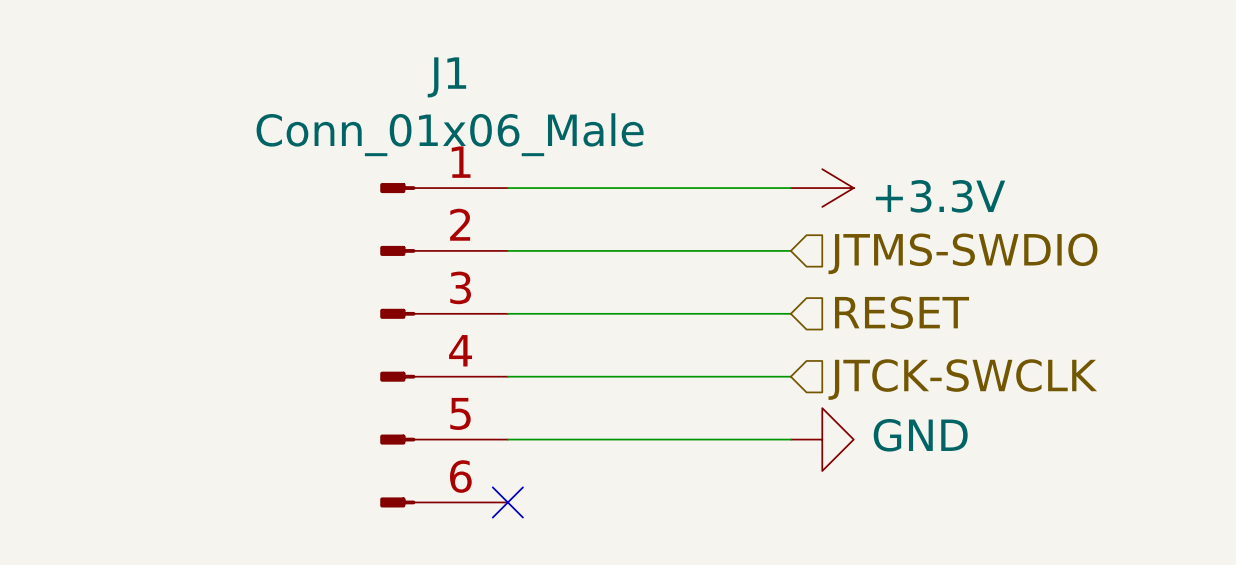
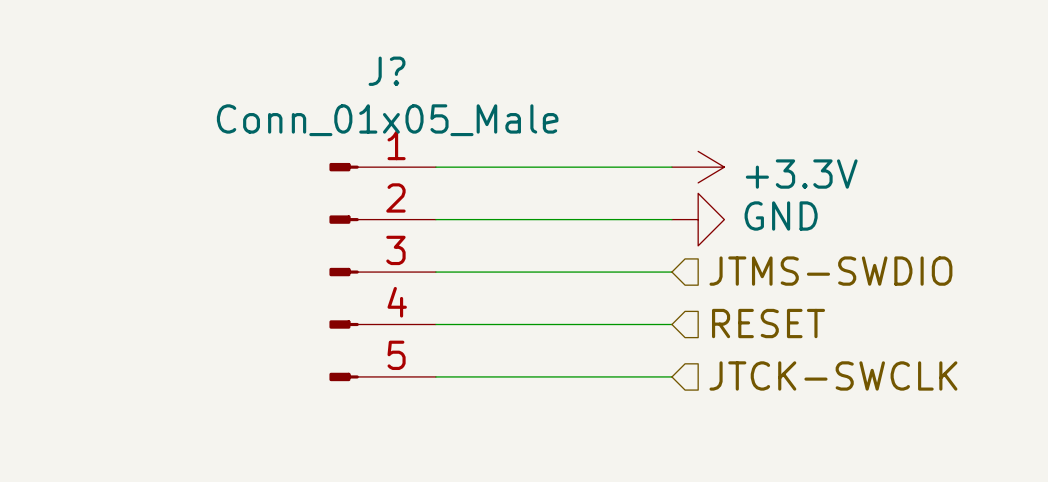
hierarchical label: JTMS-SWDIO (962, 253) -> none
hierarchical label: RESET (902, 312) -> JTMS-SWDIO (830, 271)
J?: none -> Conn_01x05_Male (382, 272)
J1: Conn_01x06_Male (444, 345) -> none
hierarchical label: JTCK-SWCLK (962, 379) -> RESET (768, 323)
power symbol position: GND (822, 439) -> GND (698, 219)
hierarchical label: none -> JTCK-SWCLK (833, 375)
no-connect mark: (507, 502) -> none

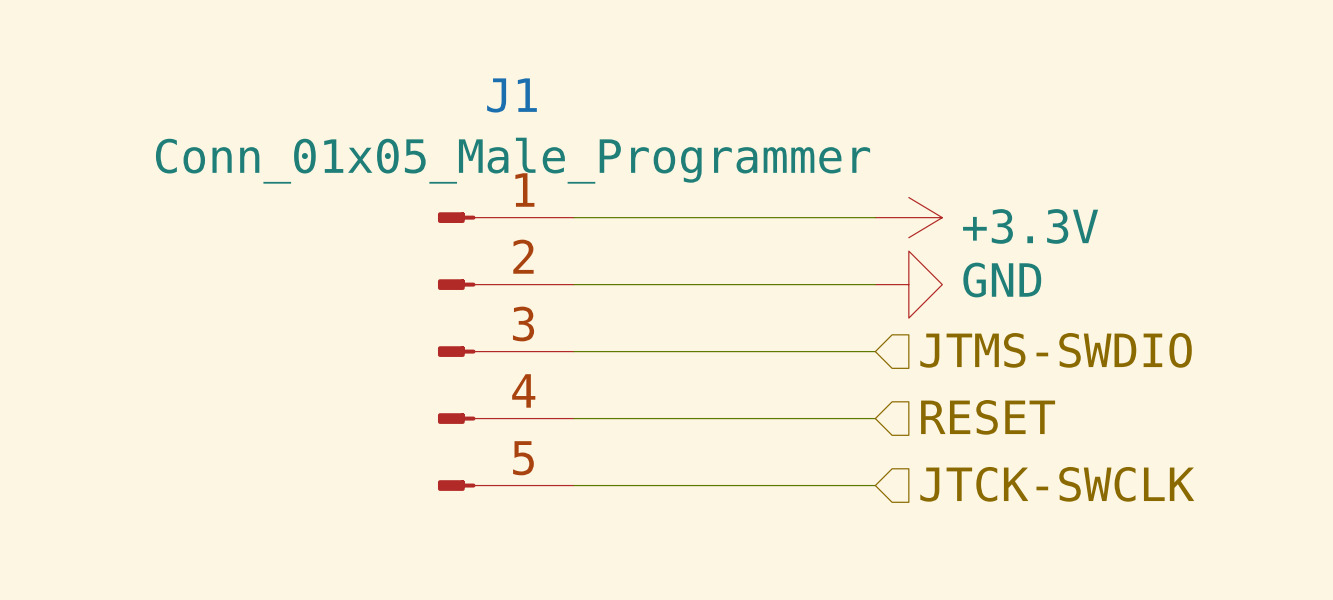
J? name: J? (387, 71) -> J1 (511, 95)
J? value: Conn_01x05_Male (387, 120) -> Conn_01x05_Male_Programmer (513, 160)

